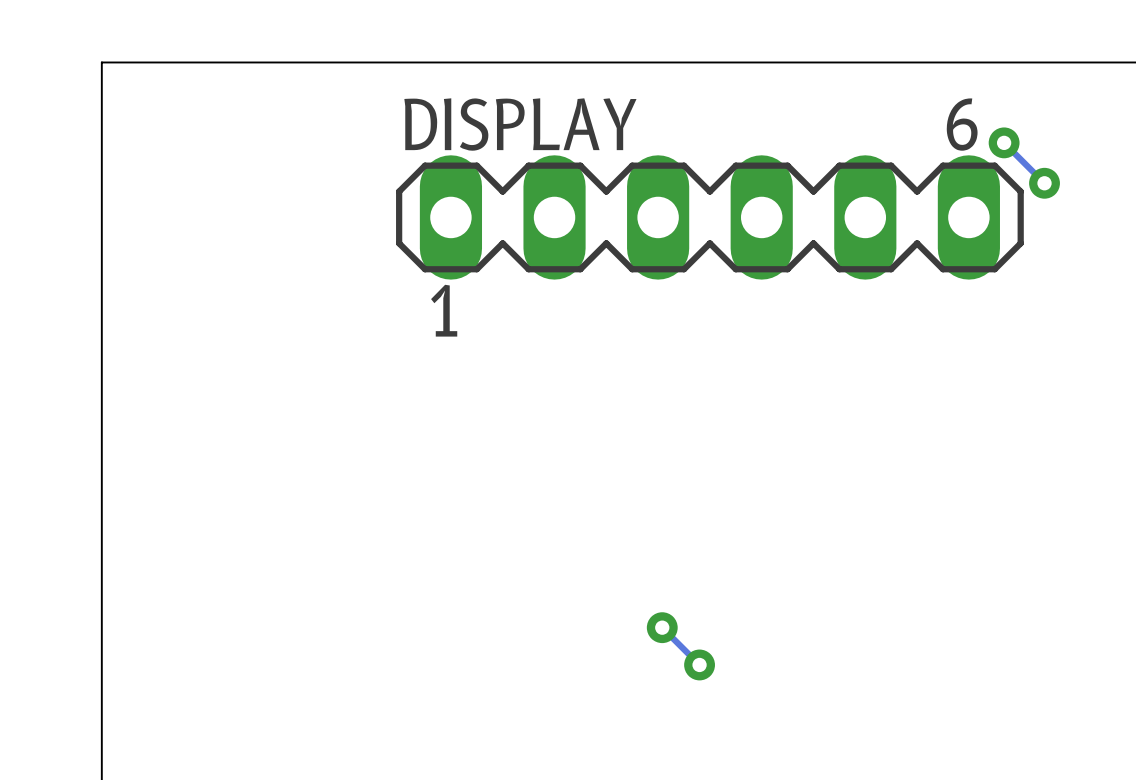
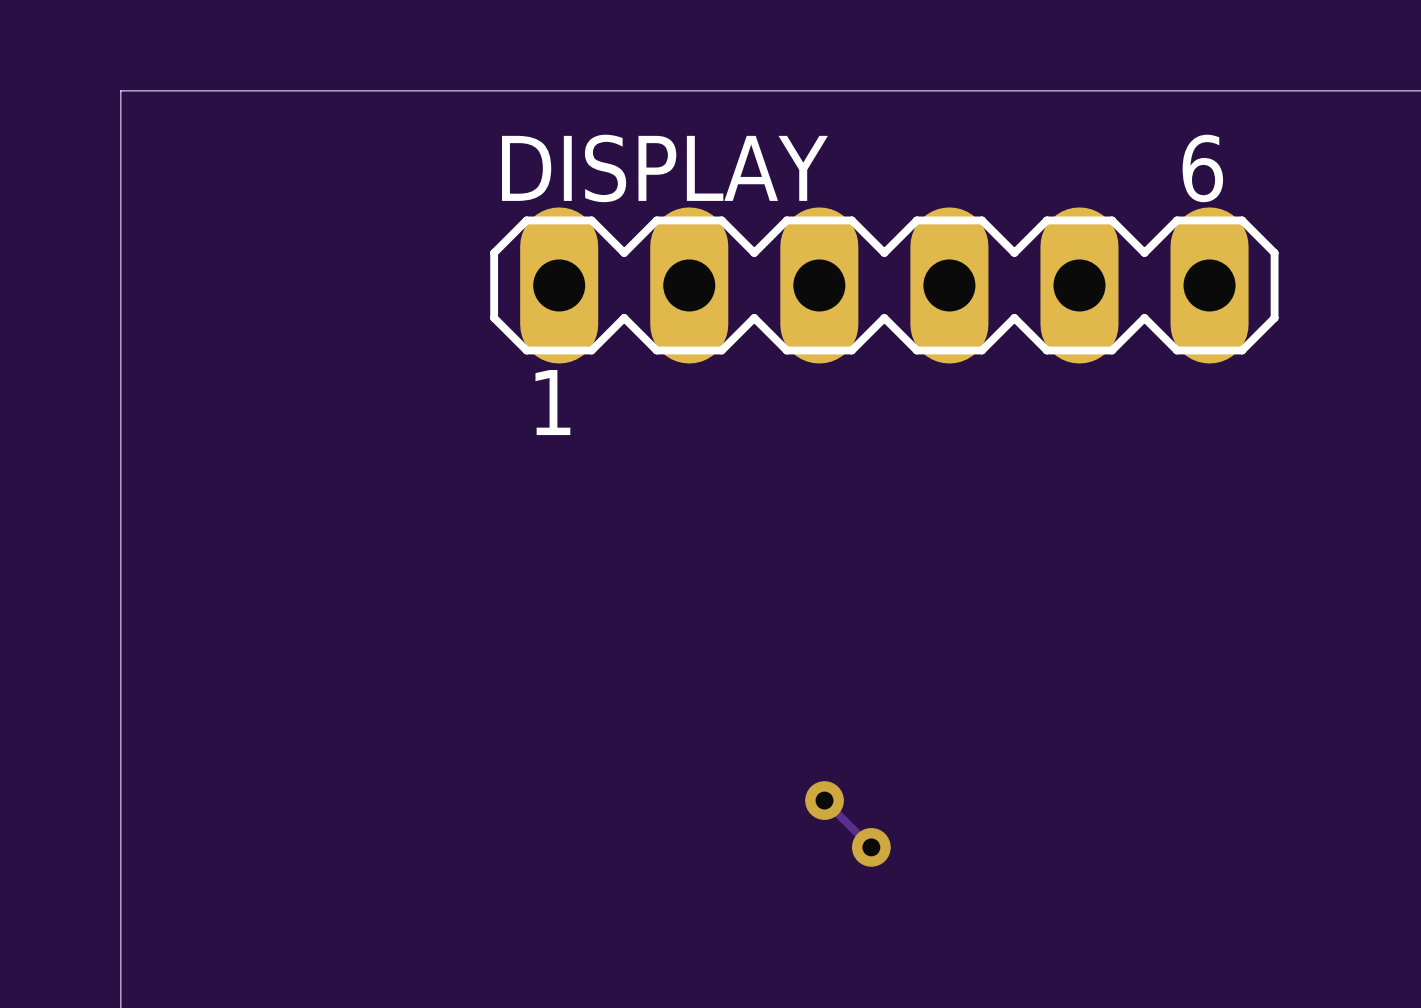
track: (1004, 142) (1044, 183) -> none
via: (1004, 142) -> none
via: (1044, 183) -> none

